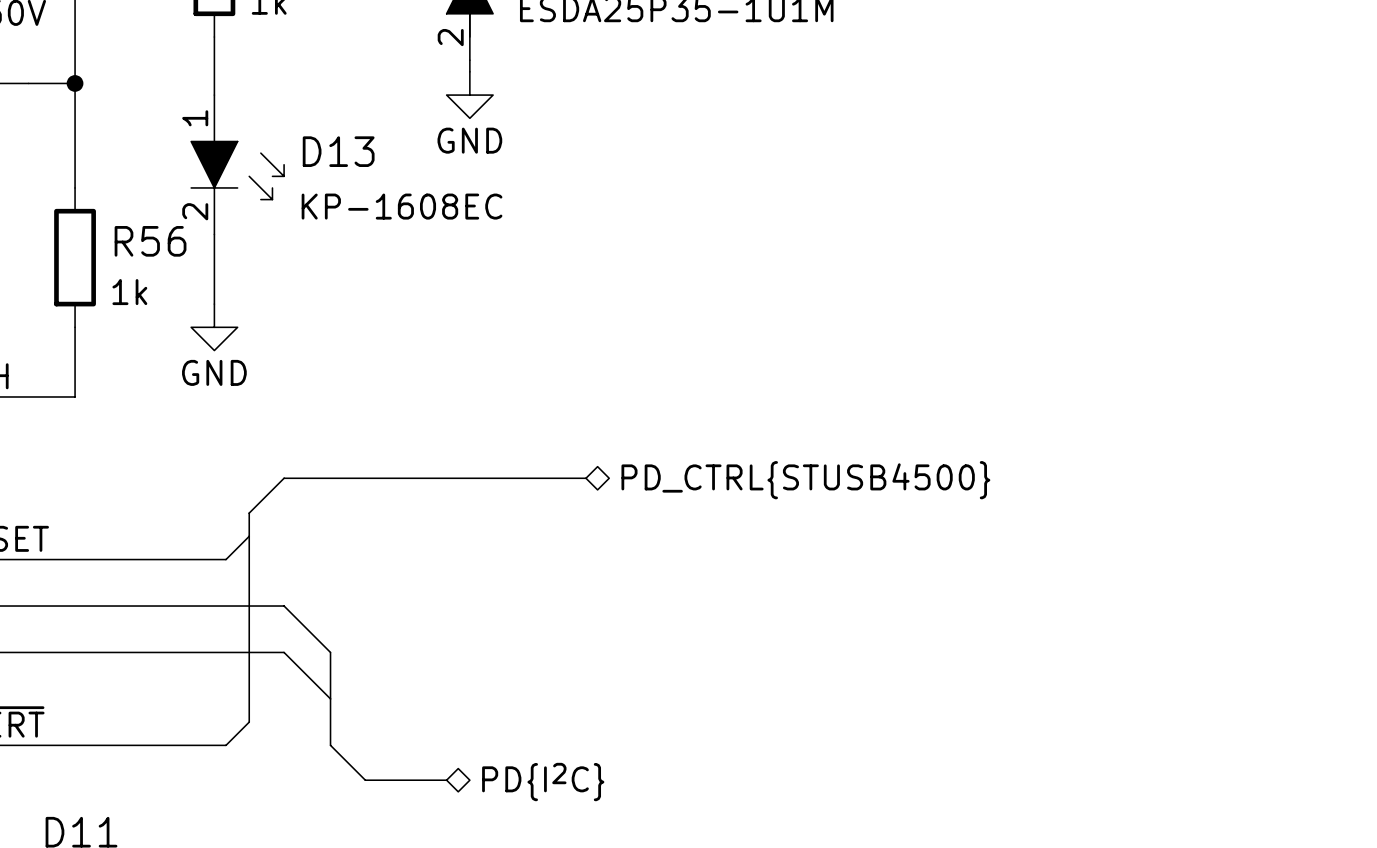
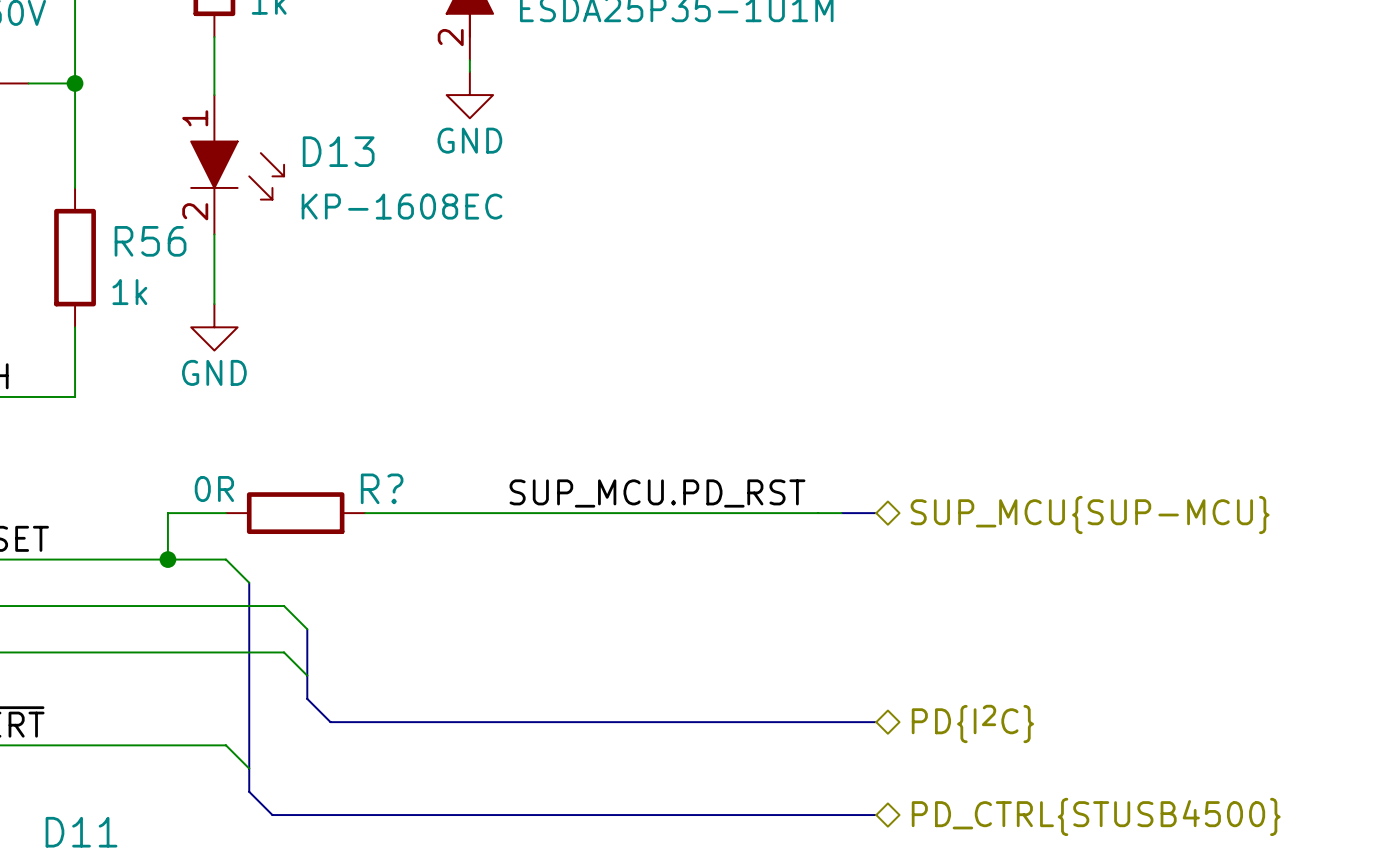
bus: (585, 478) (284, 478) (249, 513) (249, 582) -> none
hierarchical label position: PD_CTRL{STUSB4500} (805, 480) -> PD_CTRL{STUSB4500} (1096, 816)
label: none -> SUP_MCU.PD_RST (657, 493)
wire: none -> (226, 513) (167, 513) (167, 559)
R?: none -> (295, 513)
wire: none -> (365, 513) (841, 513)
bus: none -> (841, 513) (876, 513)
hierarchical label: none -> SUP_MCU{SUP-MCU} (1090, 515)
wire: (249, 536) (226, 559) -> (249, 582) (226, 559)
junction: none -> (167, 559)
wire: (307, 629) (330, 652) -> none
bus: none -> (307, 629) (307, 698) (330, 722) (876, 722)
bus: (330, 652) (330, 745) (365, 780) (446, 780) -> none
wire: (307, 675) (330, 698) -> none
wire: (249, 722) (226, 745) -> (249, 768) (226, 745)
bus: none -> (249, 722) (249, 791) (272, 815) (876, 815)
hierarchical label position: PD{I2C} (543, 782) -> PD{I2C} (972, 723)

